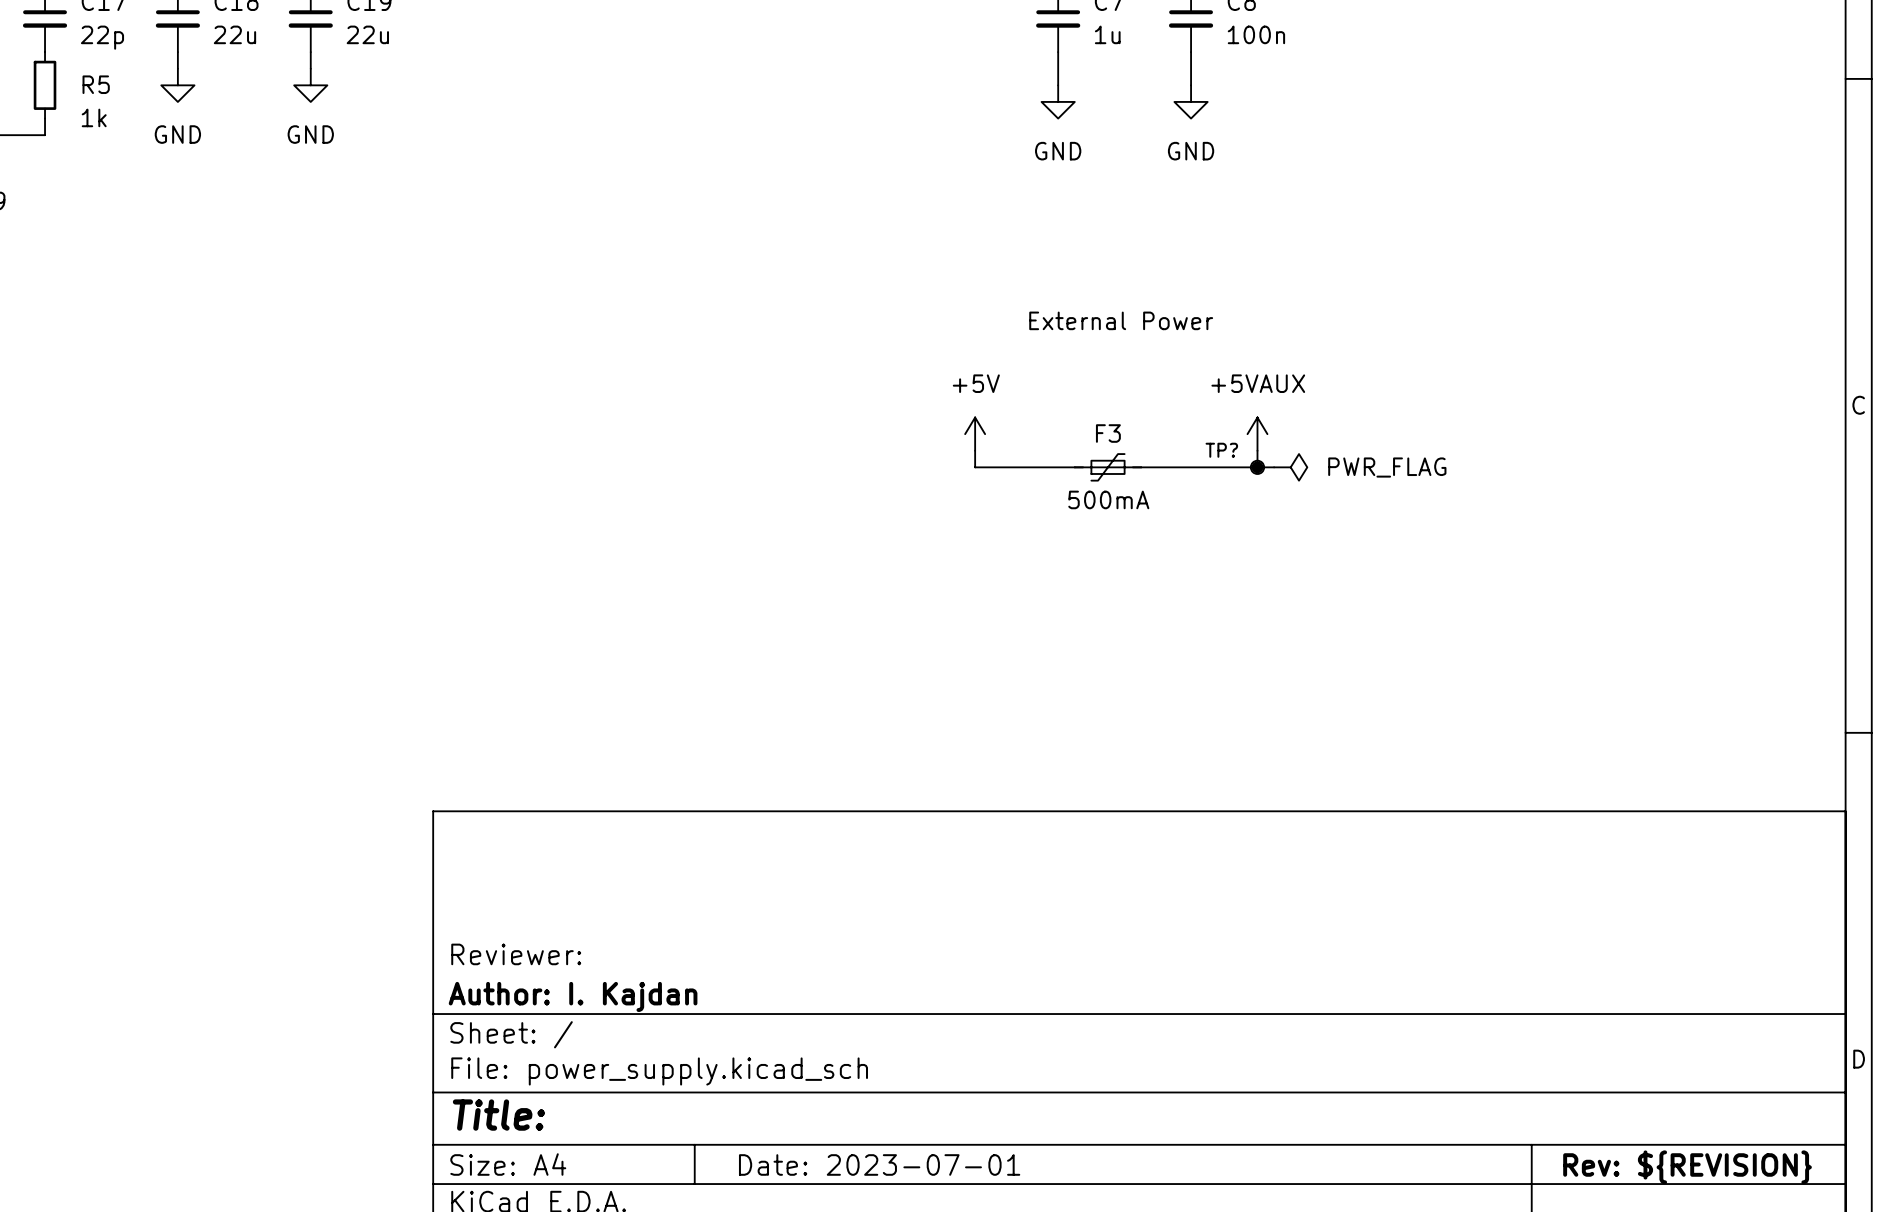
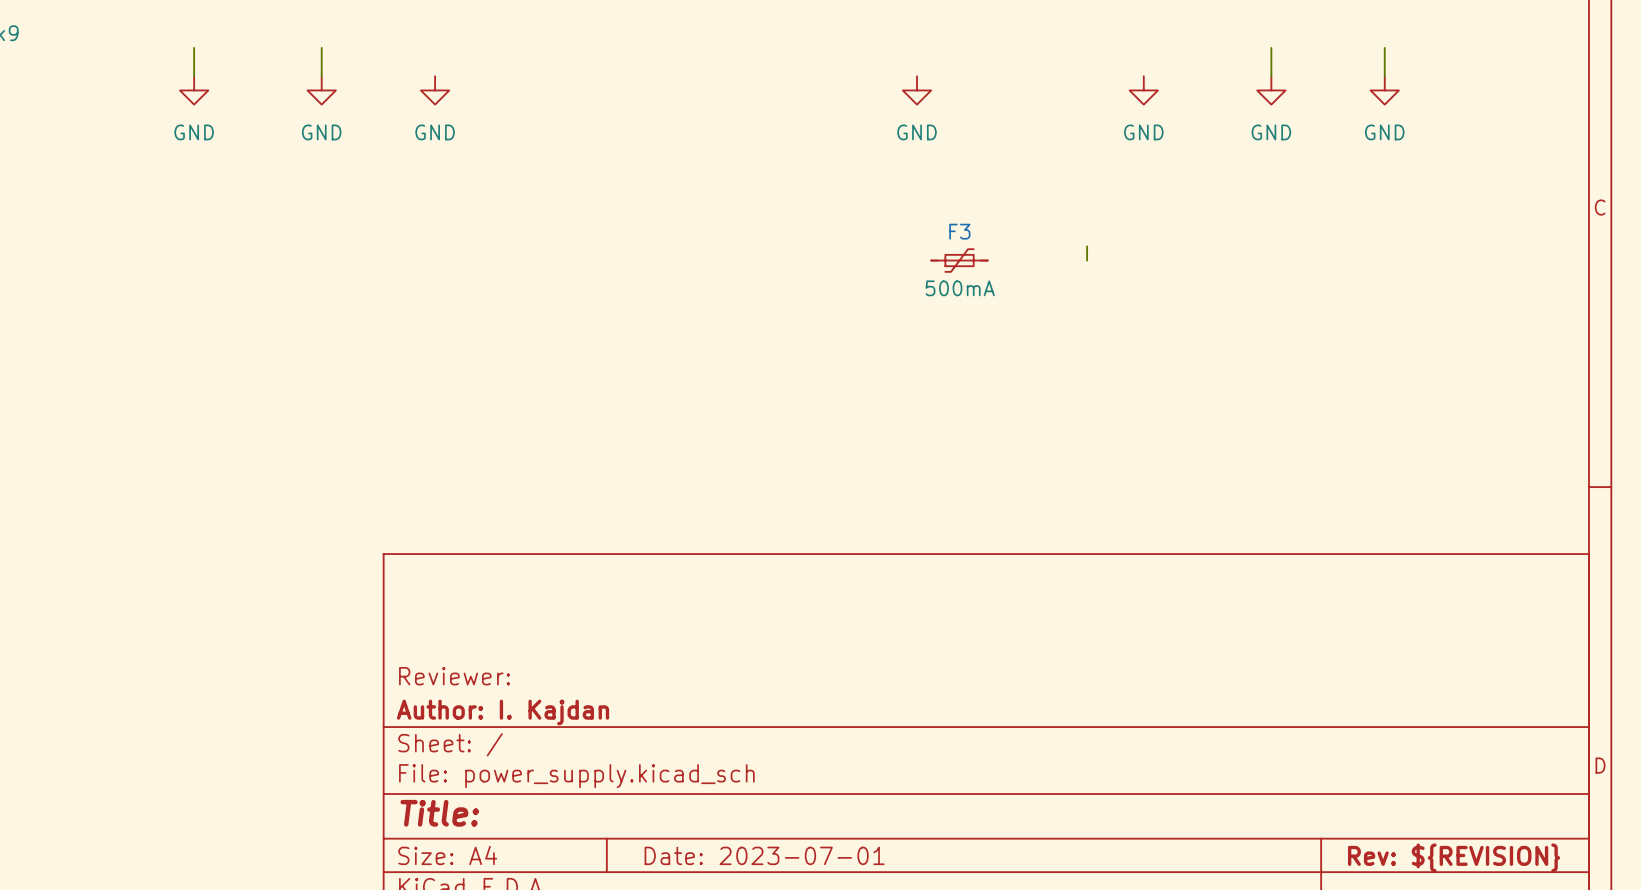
wire: none -> (194, 47) (194, 76)
wire: none -> (321, 47) (321, 76)
wire: none -> (1271, 47) (1271, 76)
wire: none -> (1384, 47) (1384, 76)
power symbol: none -> GND (194, 90)
power symbol: none -> GND (321, 90)
power symbol: none -> GND (435, 90)
power symbol: none -> GND (917, 90)
power symbol: none -> GND (1143, 90)
power symbol: none -> GND (1271, 90)
power symbol: none -> GND (1384, 90)
text: External Power (1121, 320) -> none
power symbol: +5V (975, 434) -> none
power symbol: +5VAUX (1257, 434) -> none
wire: (975, 450) (975, 467) (1074, 467) -> none
wire: (1141, 467) (1274, 467) -> none
junction: (1257, 467) -> none
TP?: (1257, 467) -> none
power symbol: PWR_FLAG (1290, 467) -> none

